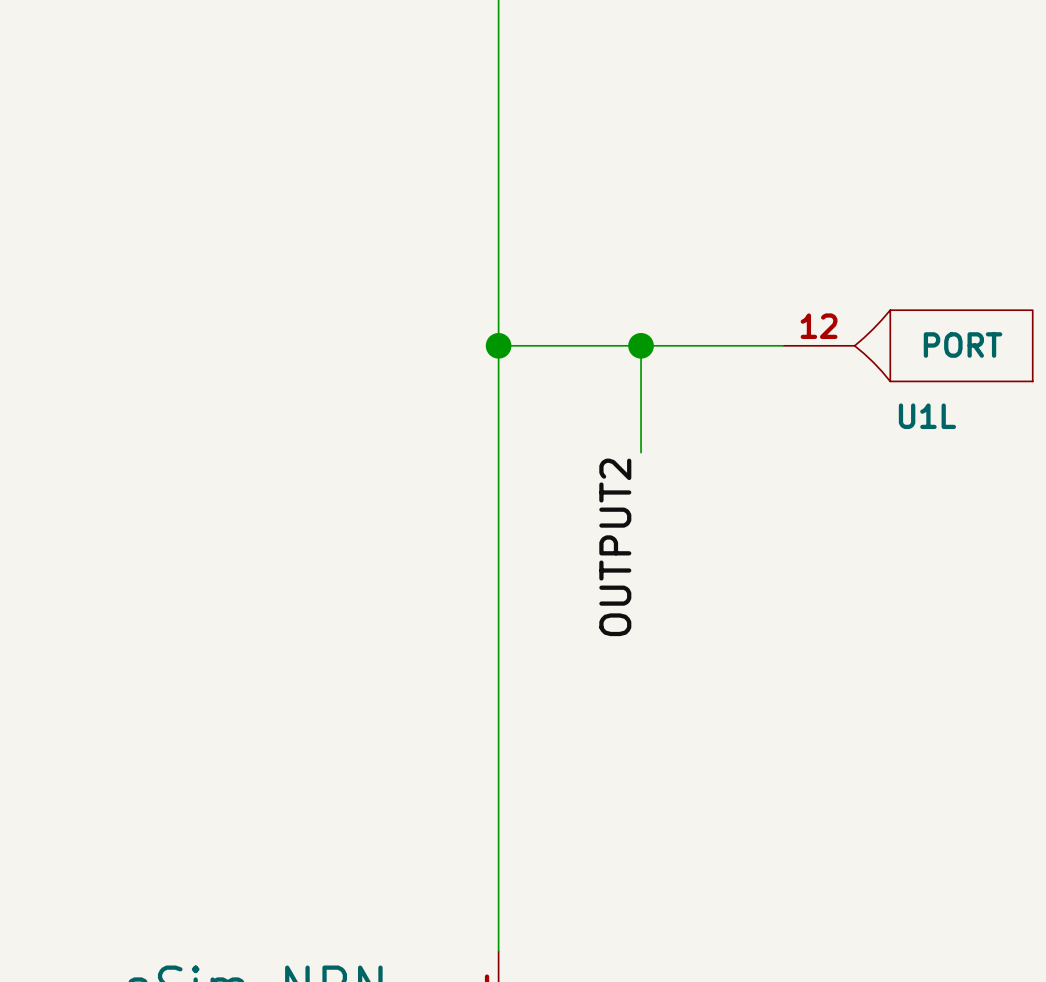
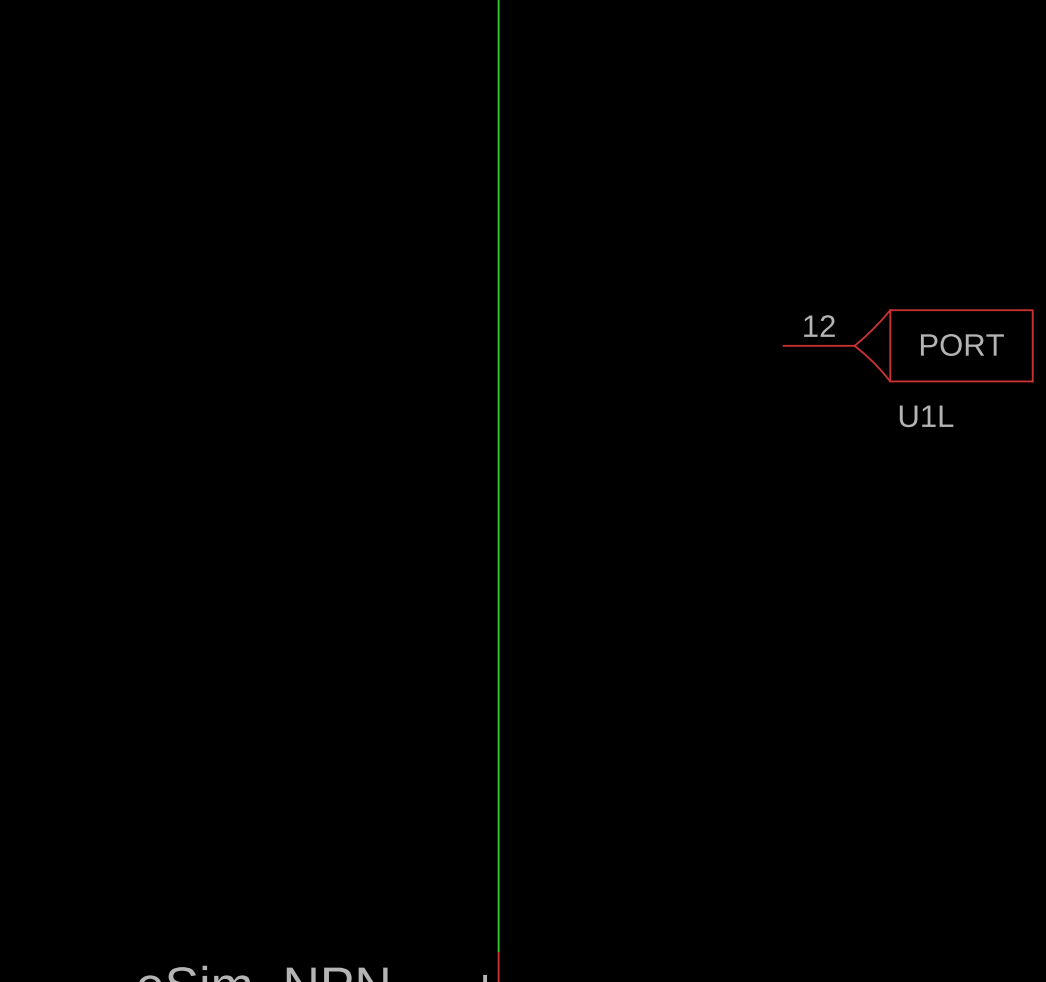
wire: (498, 345) (783, 345) -> none
junction: (498, 345) -> none
wire: (641, 345) (641, 452) -> none
junction: (641, 345) -> none
label: OUTPUT2 (615, 547) -> none

